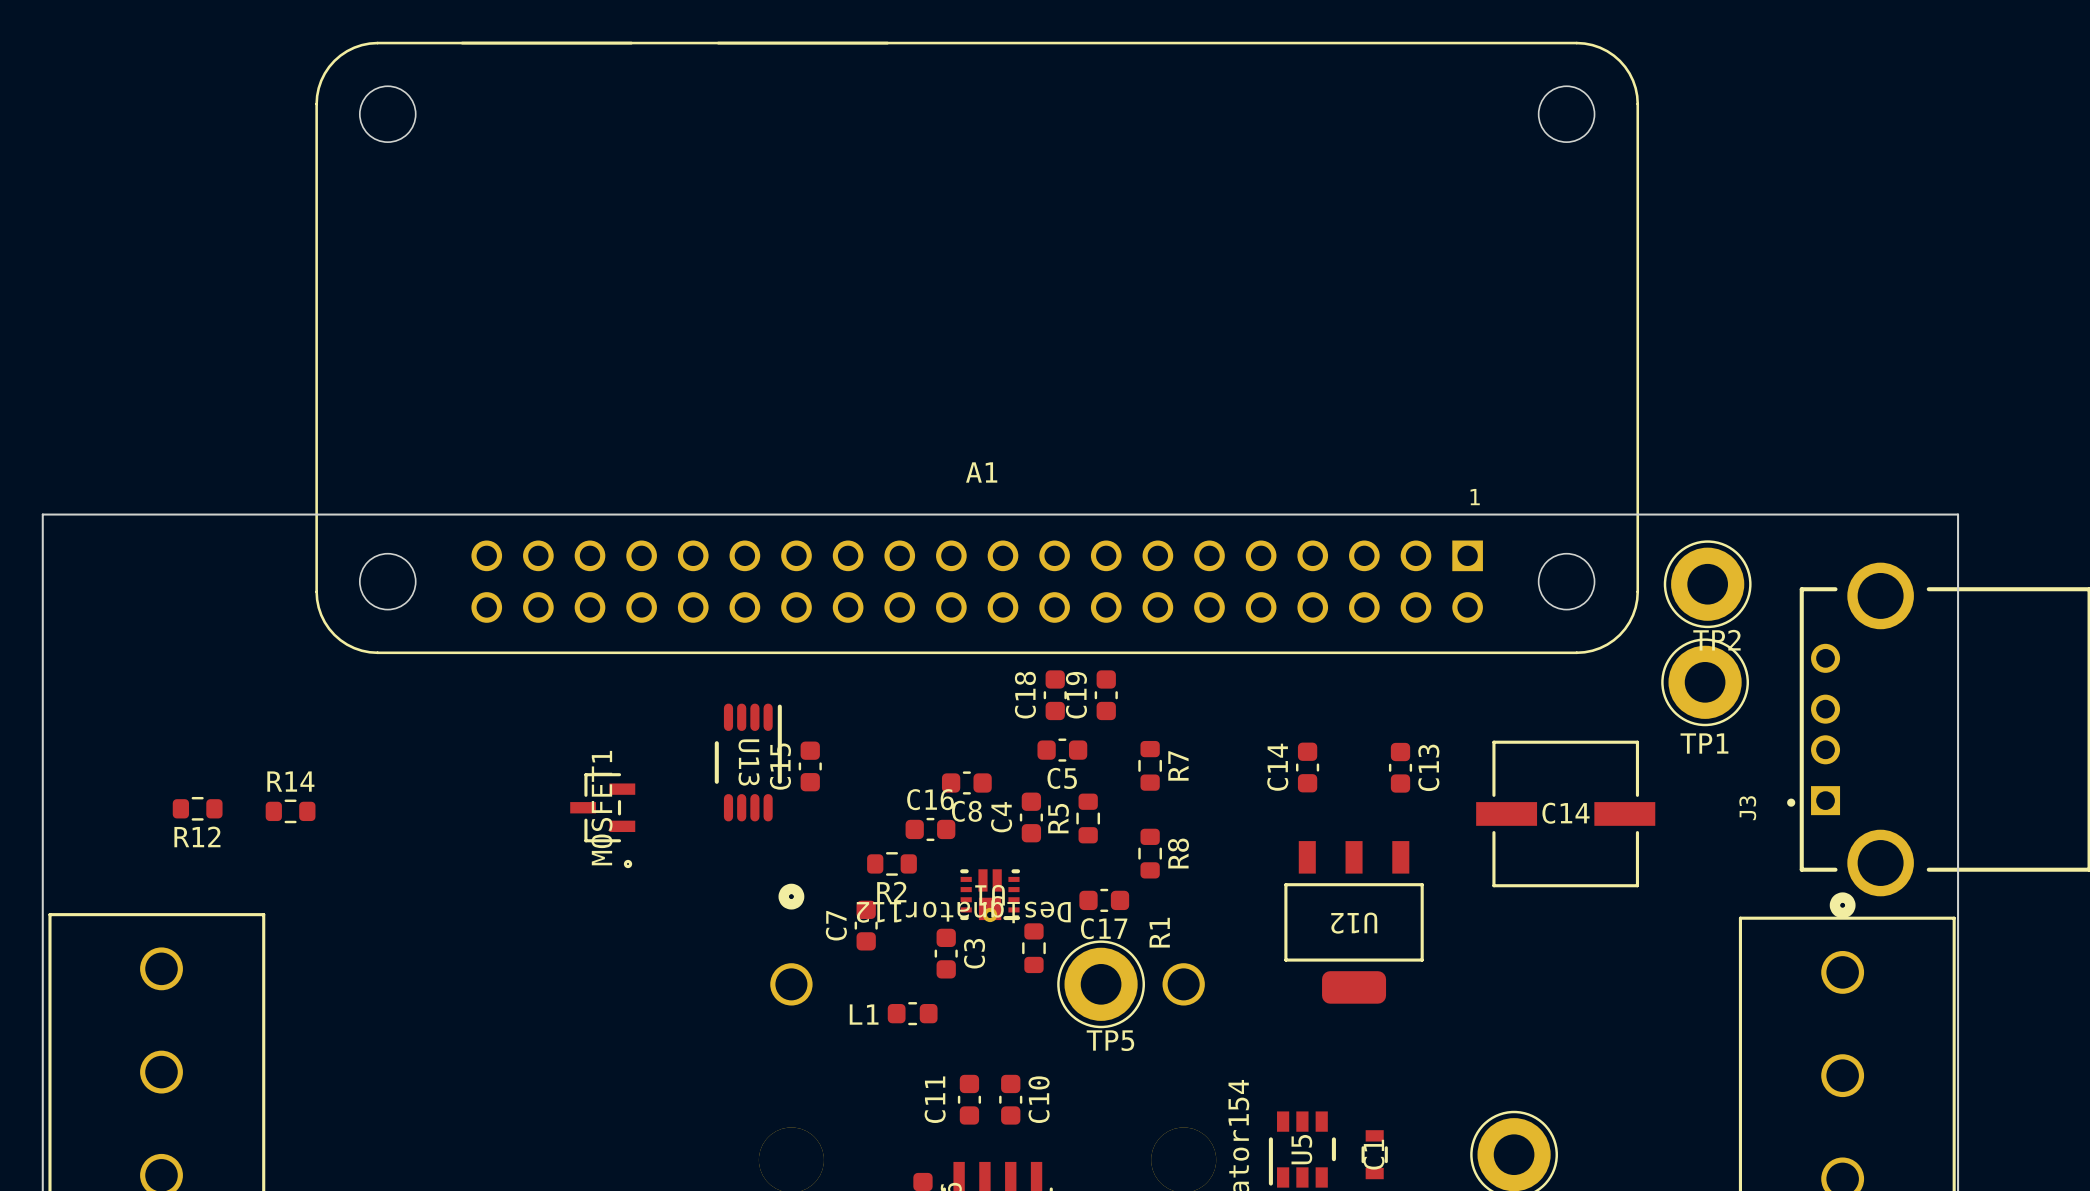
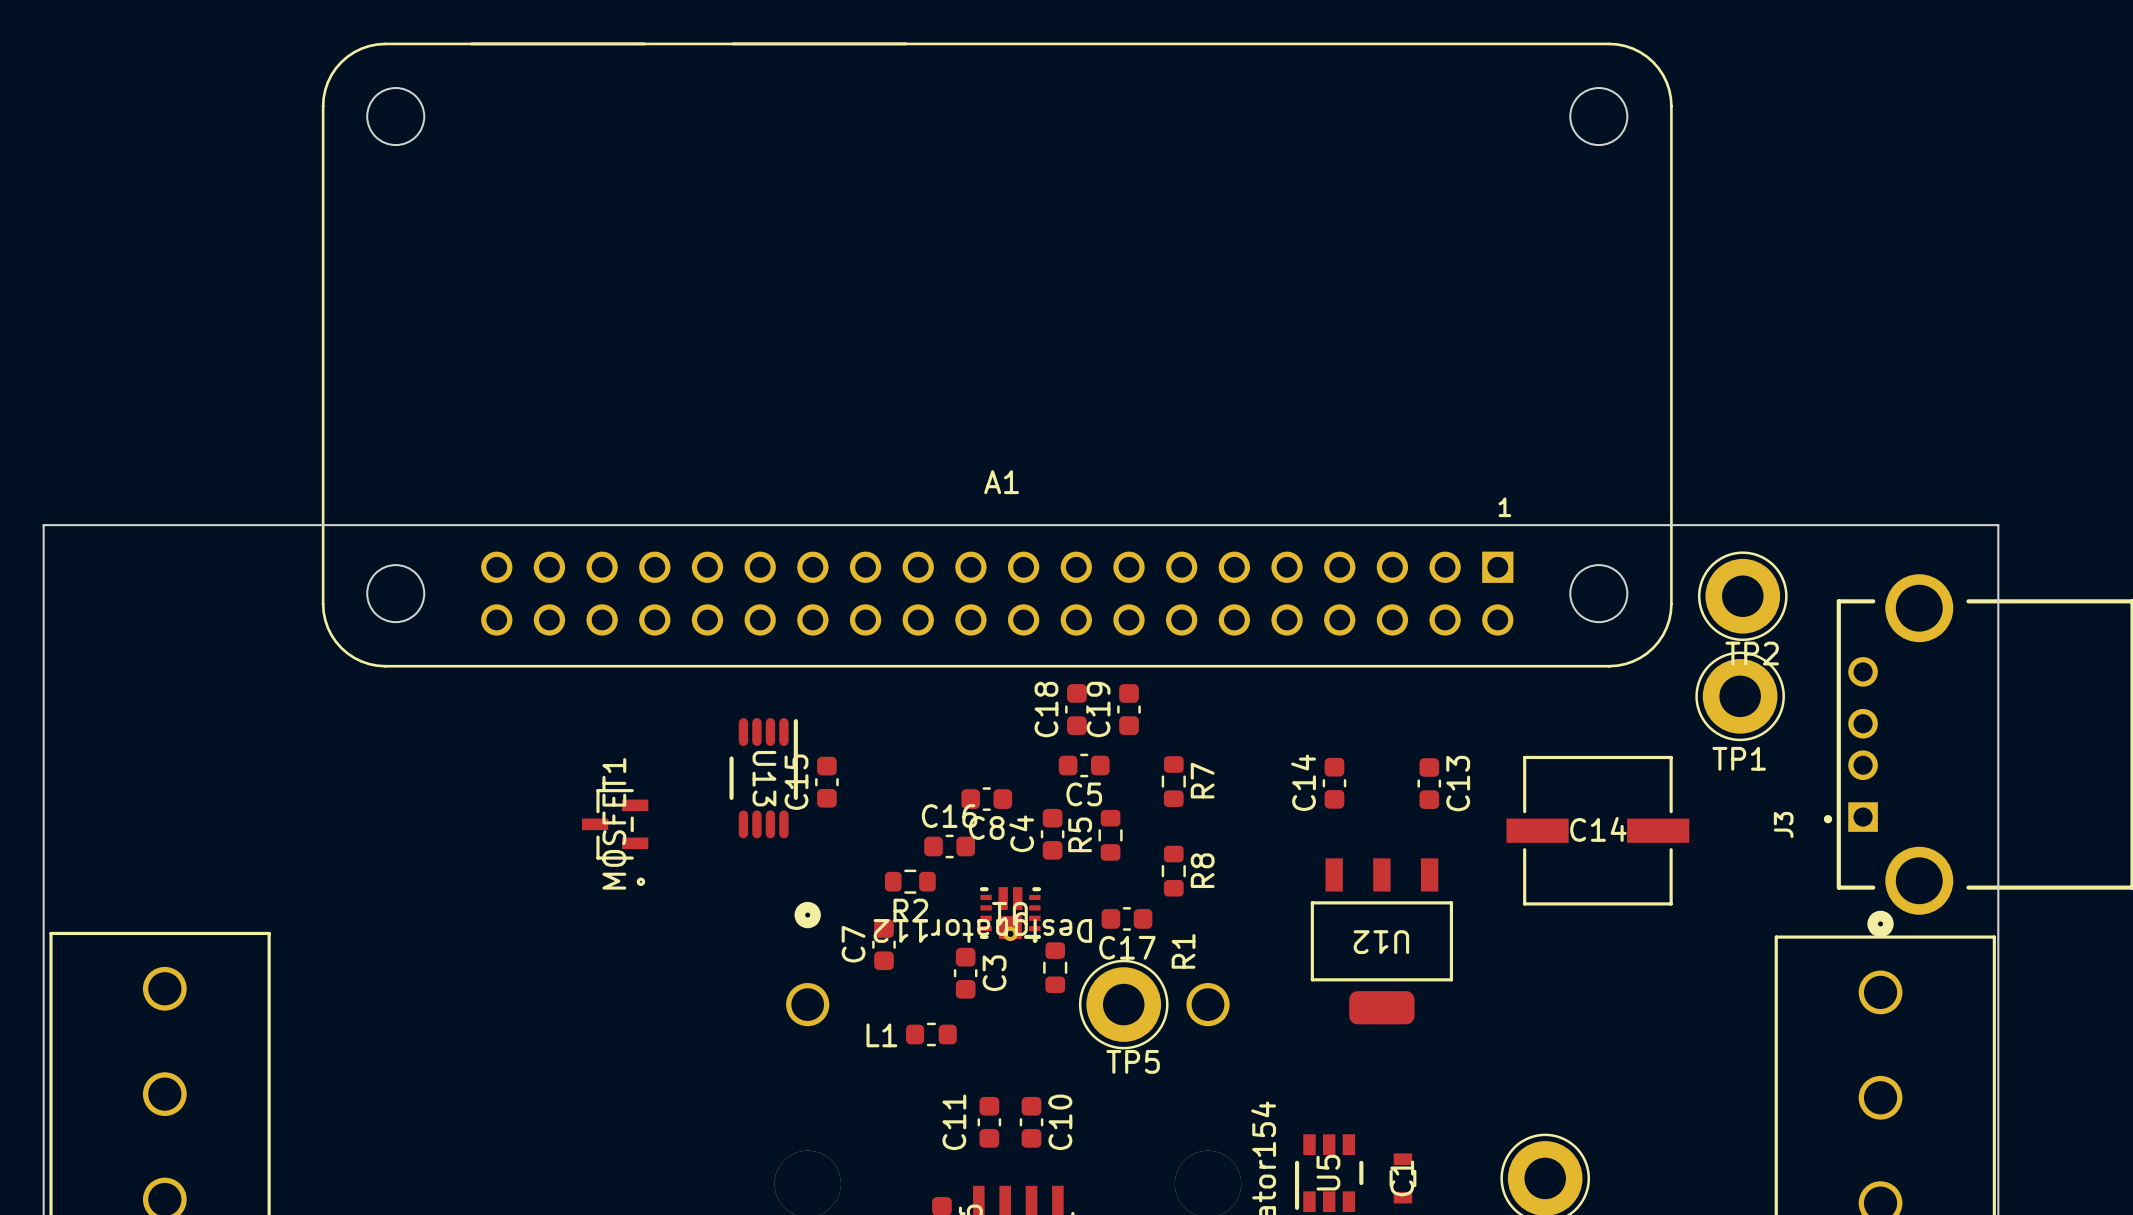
R12: (197, 808) -> none
R14: (290, 811) -> none

